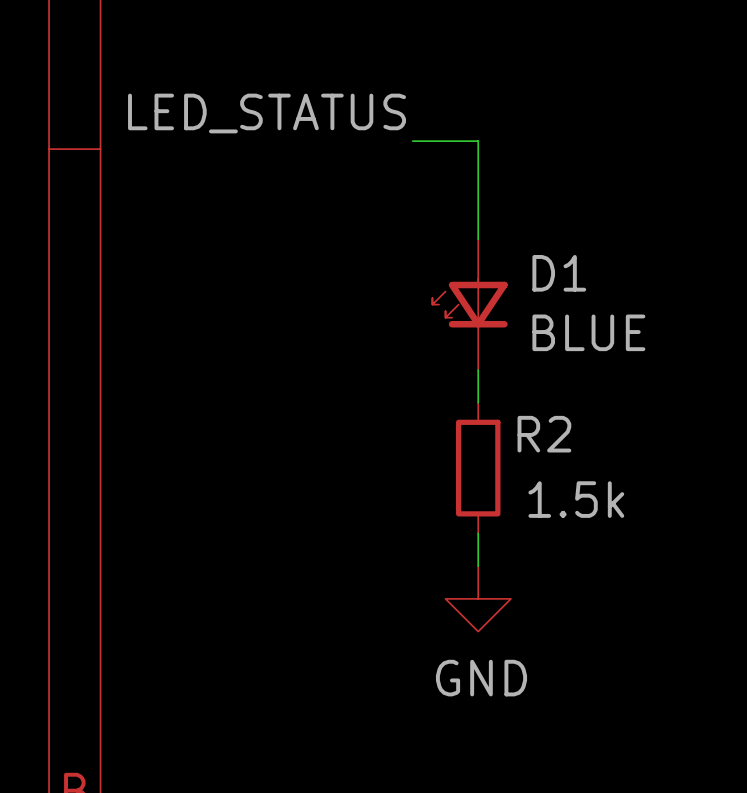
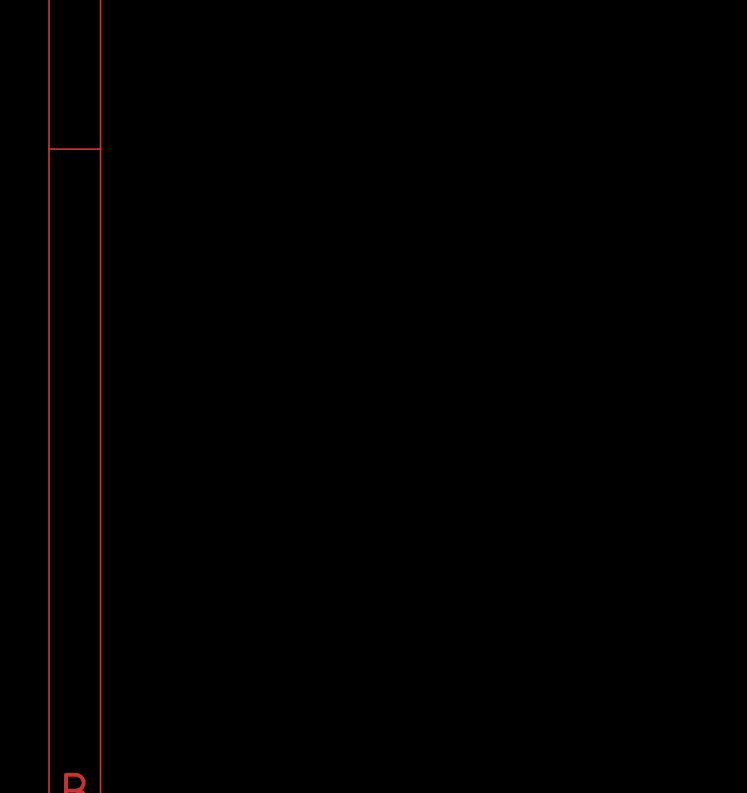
label: LED_STATUS (267, 113) -> none
wire: (412, 141) (478, 141) (478, 239) -> none
D1: BLUE (470, 304) -> none
wire: (478, 370) (478, 402) -> none
R2: 1.5k (478, 468) -> none
wire: (478, 533) (478, 566) -> none
power symbol: GND (478, 598) -> none

